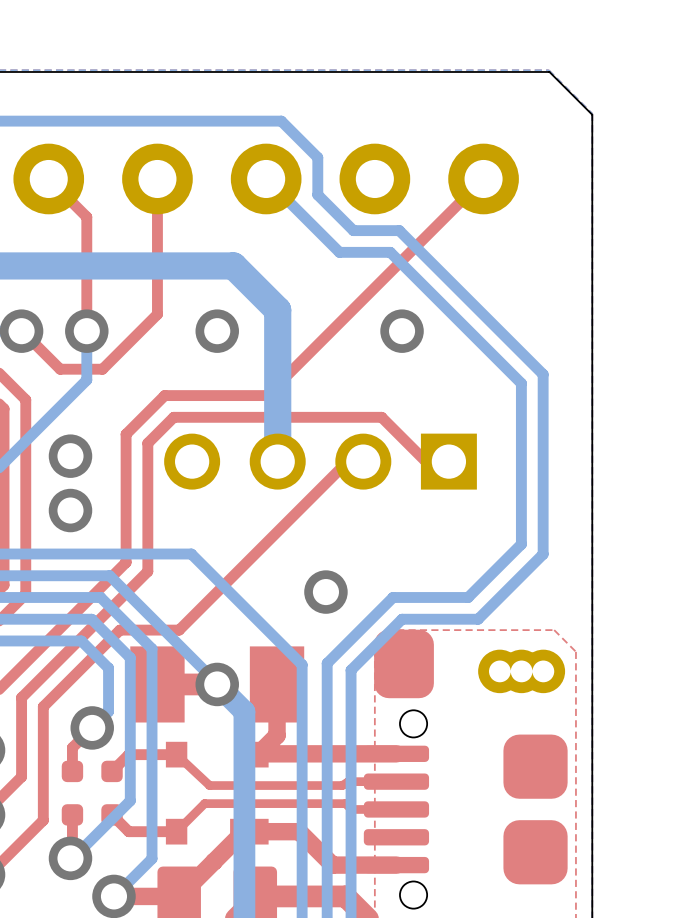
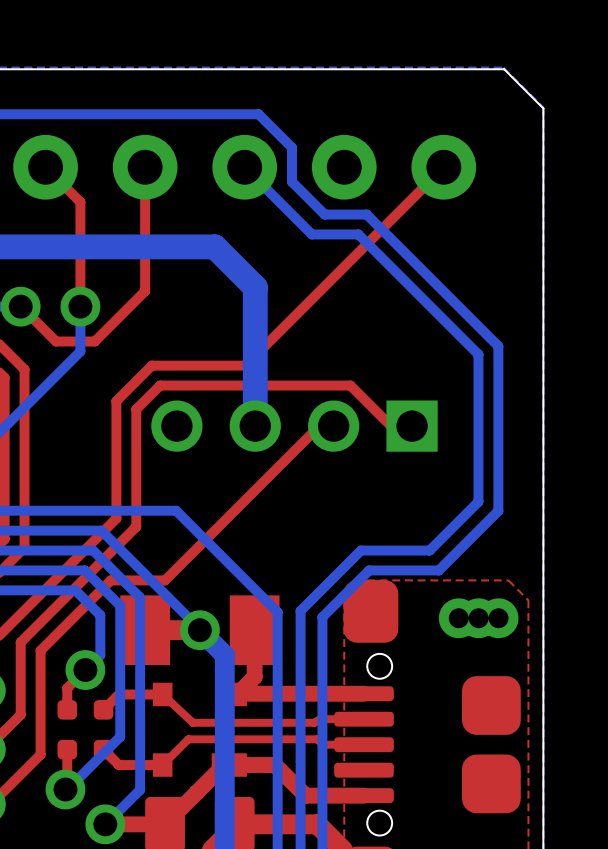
via: (217, 331) -> none
via: (402, 331) -> none
via: (70, 456) -> none
via: (70, 510) -> none
via: (325, 592) -> none

